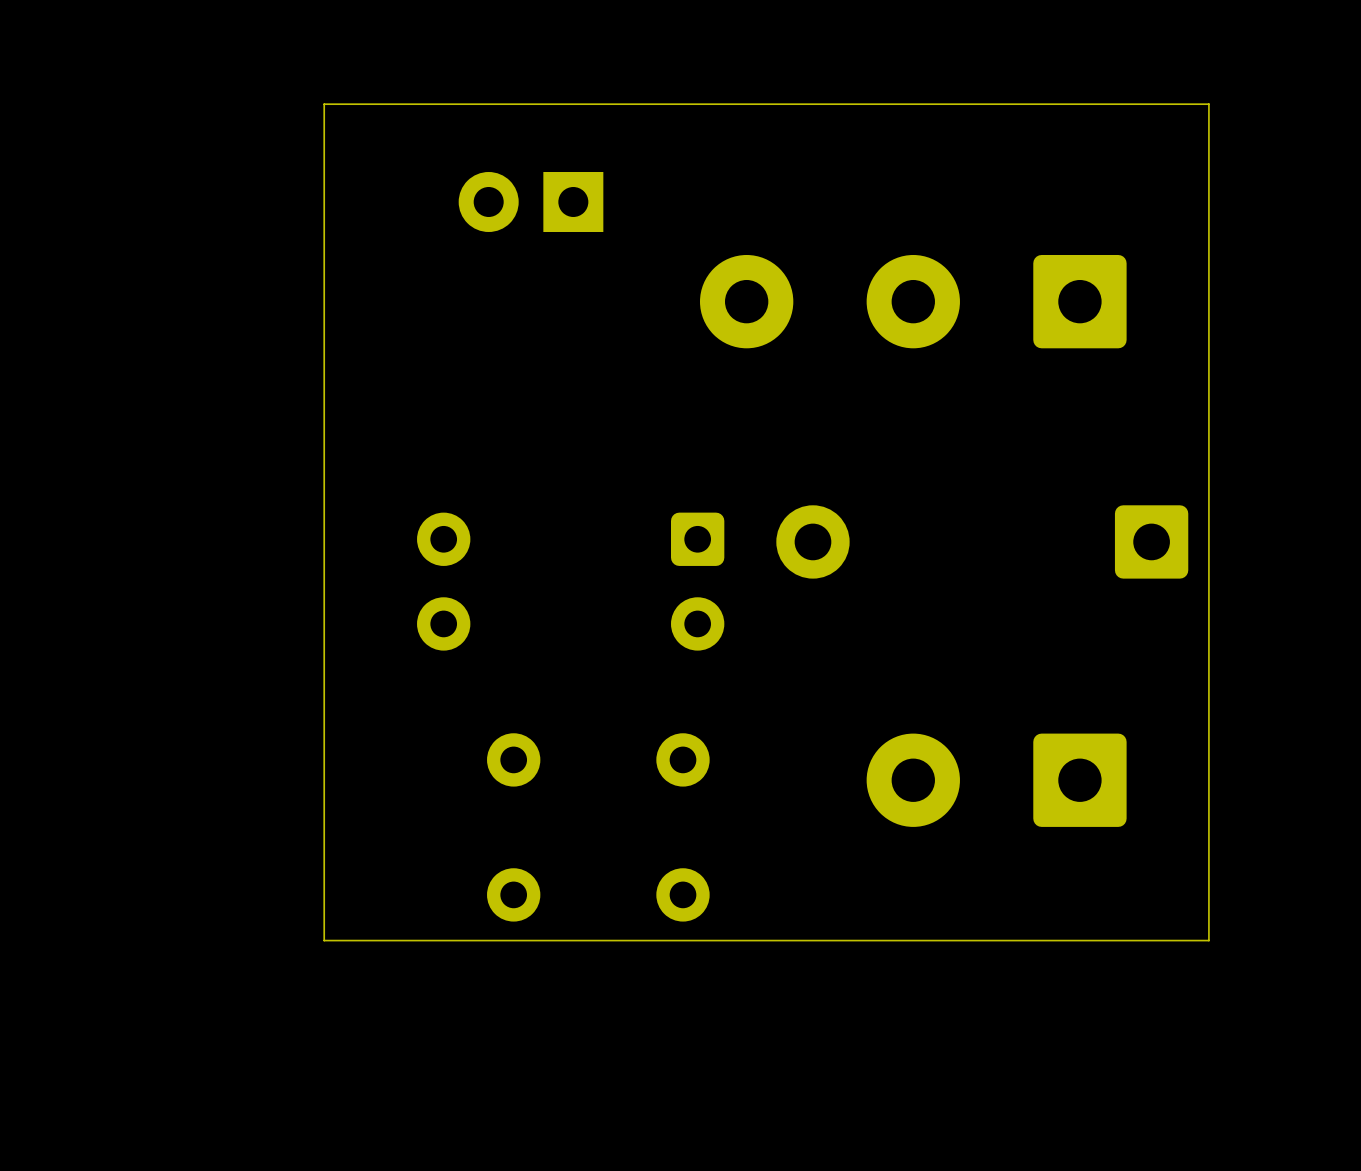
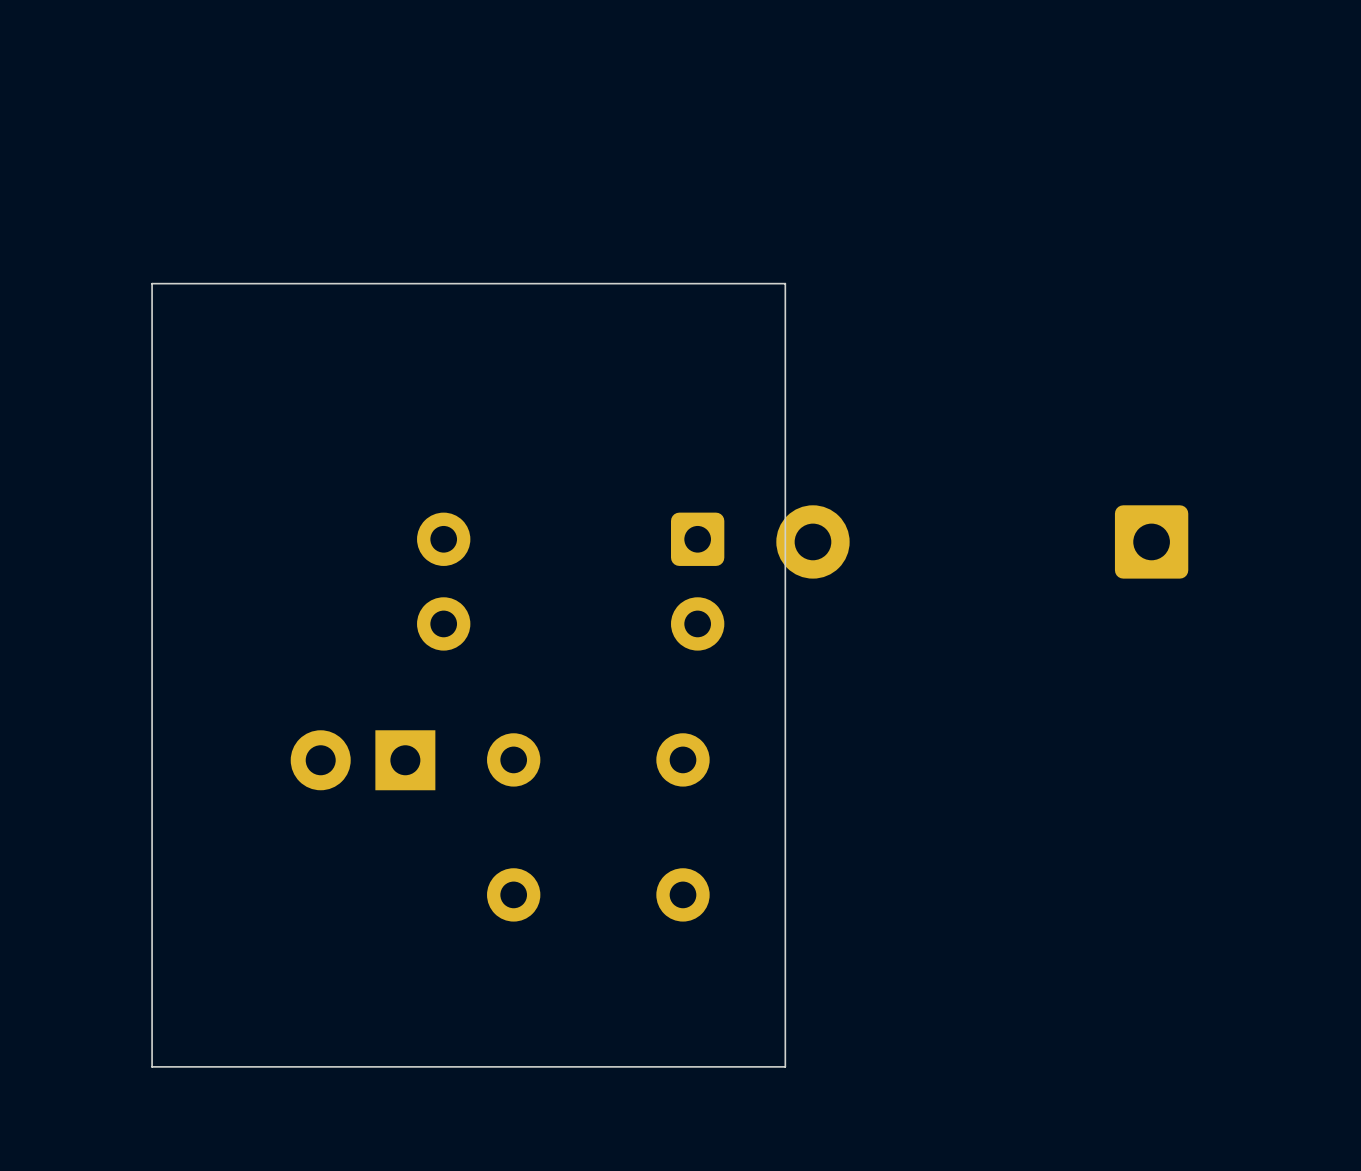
board edge: (1208, 104) (324, 104) (324, 940) (1208, 940) (1208, 104) -> none
part position: (531, 201) -> (363, 760)
board edge: none -> (785, 283) (152, 283) (152, 1066) (785, 1066) (785, 283)
part: (913, 301) -> none
part: (996, 780) -> none

